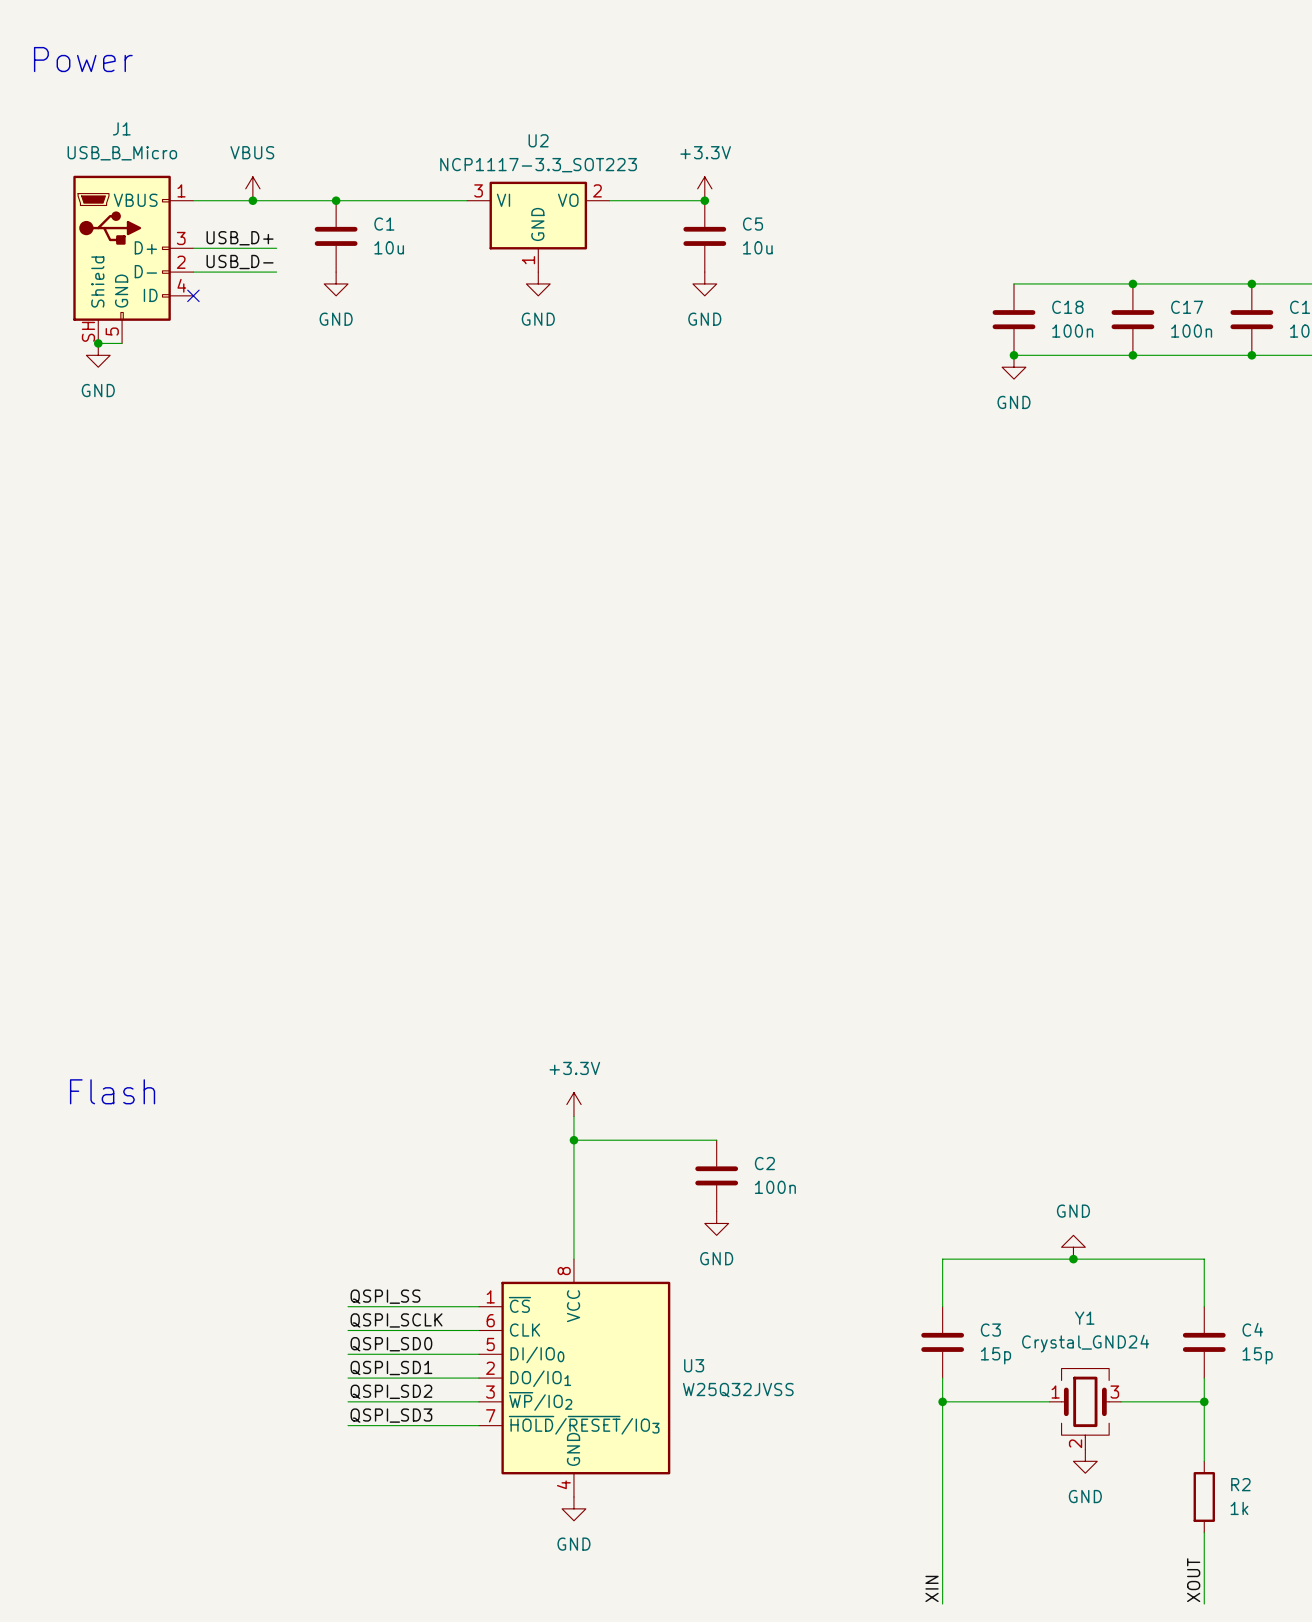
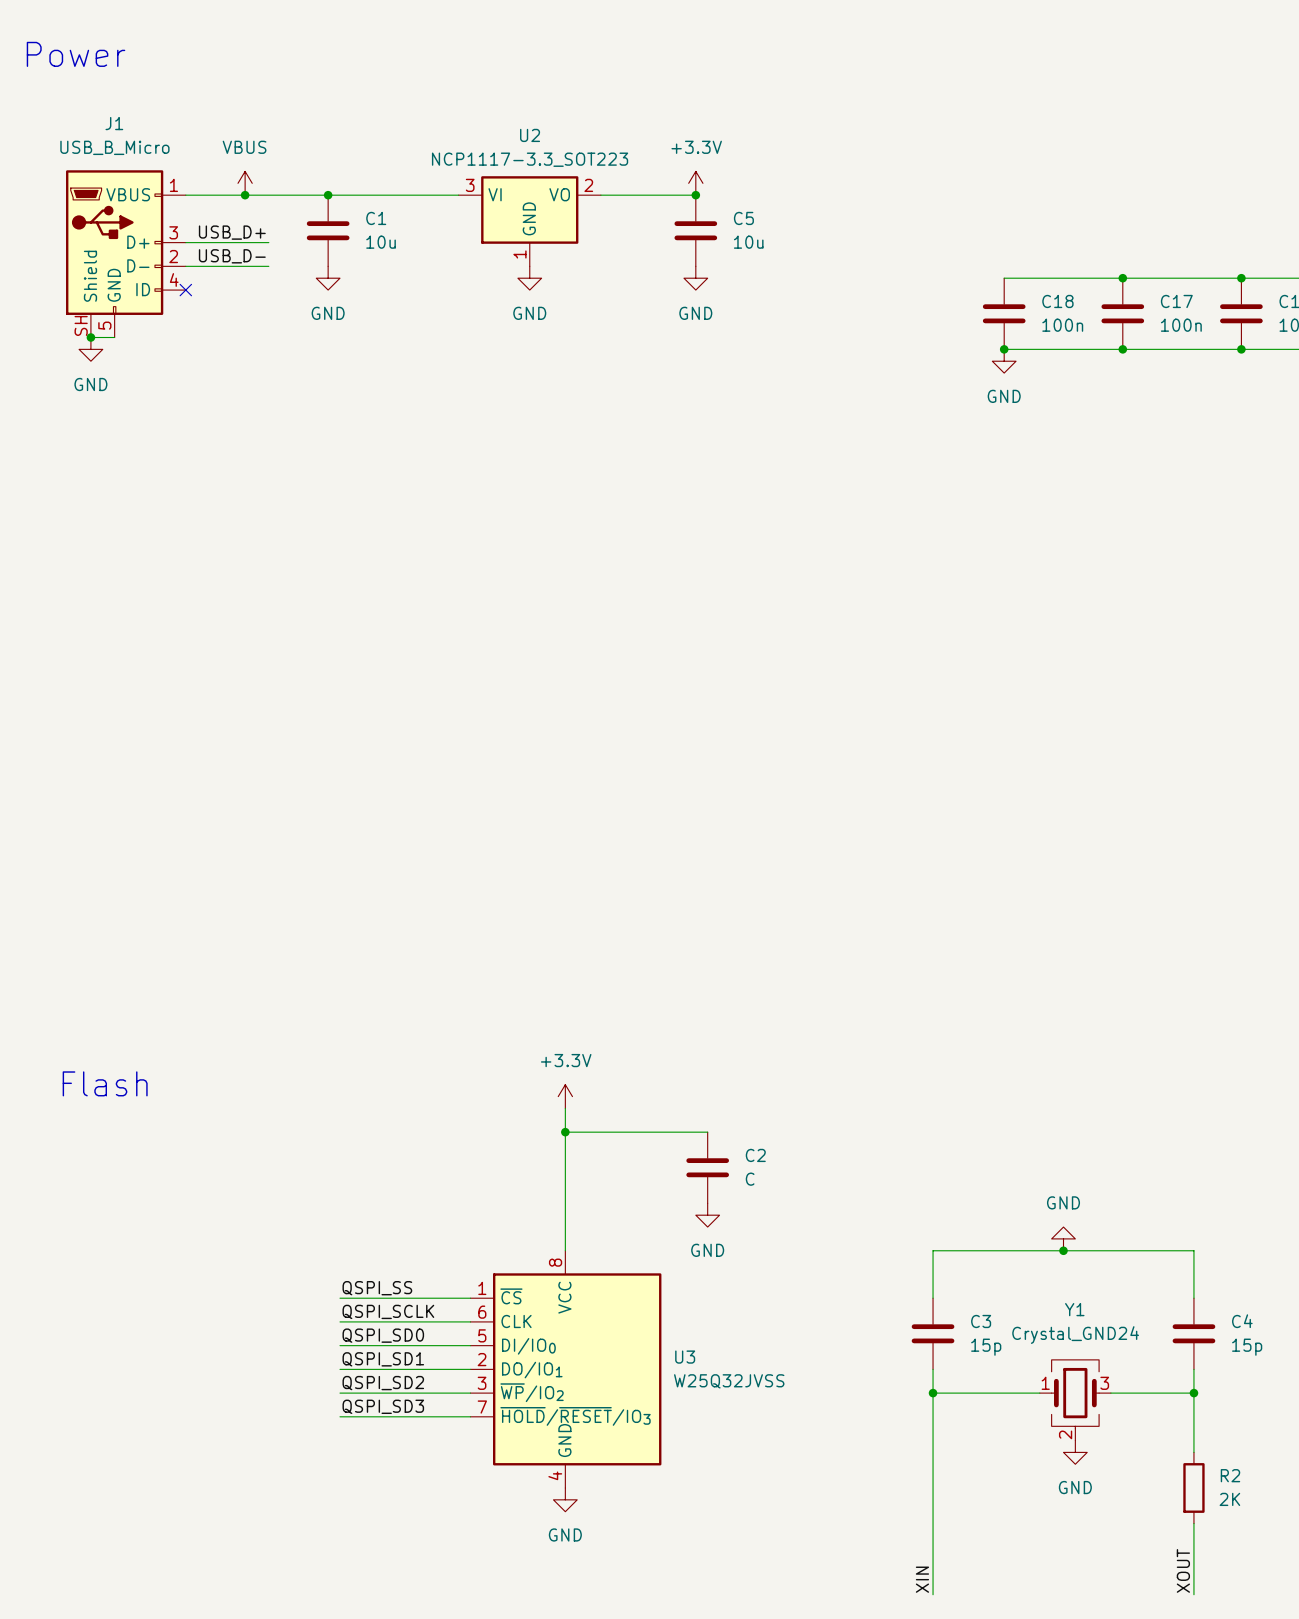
C2 value: 100n (775, 1187) -> C (750, 1179)
R2 value: 1k (1239, 1508) -> 2K (1229, 1499)

